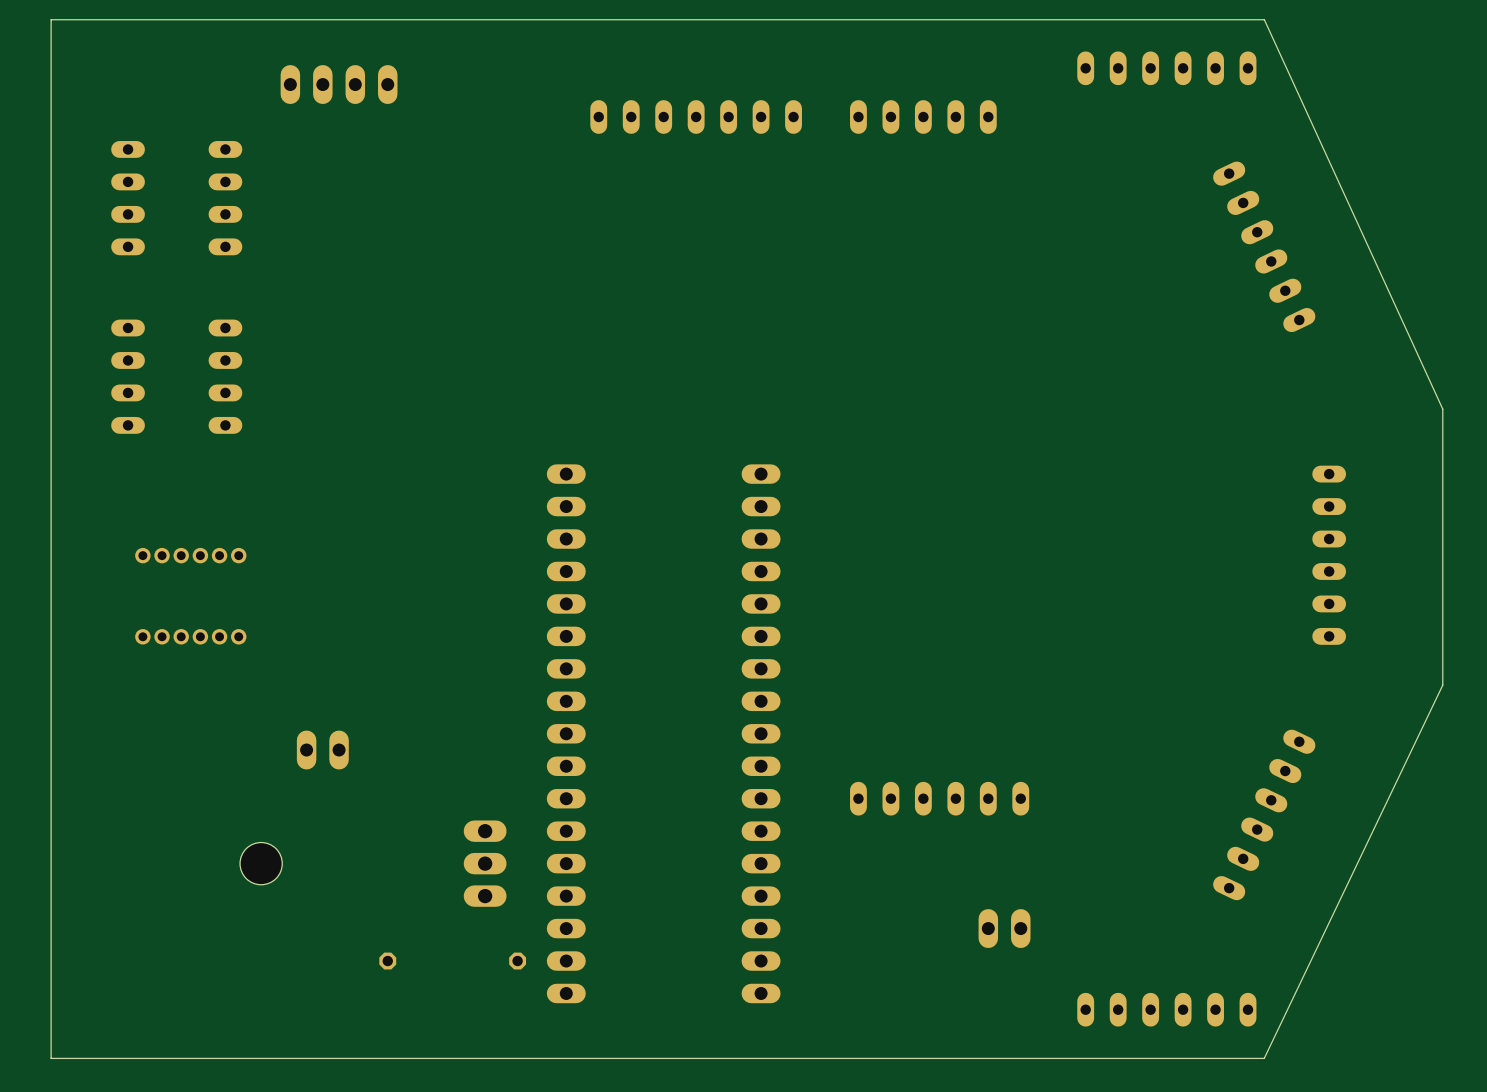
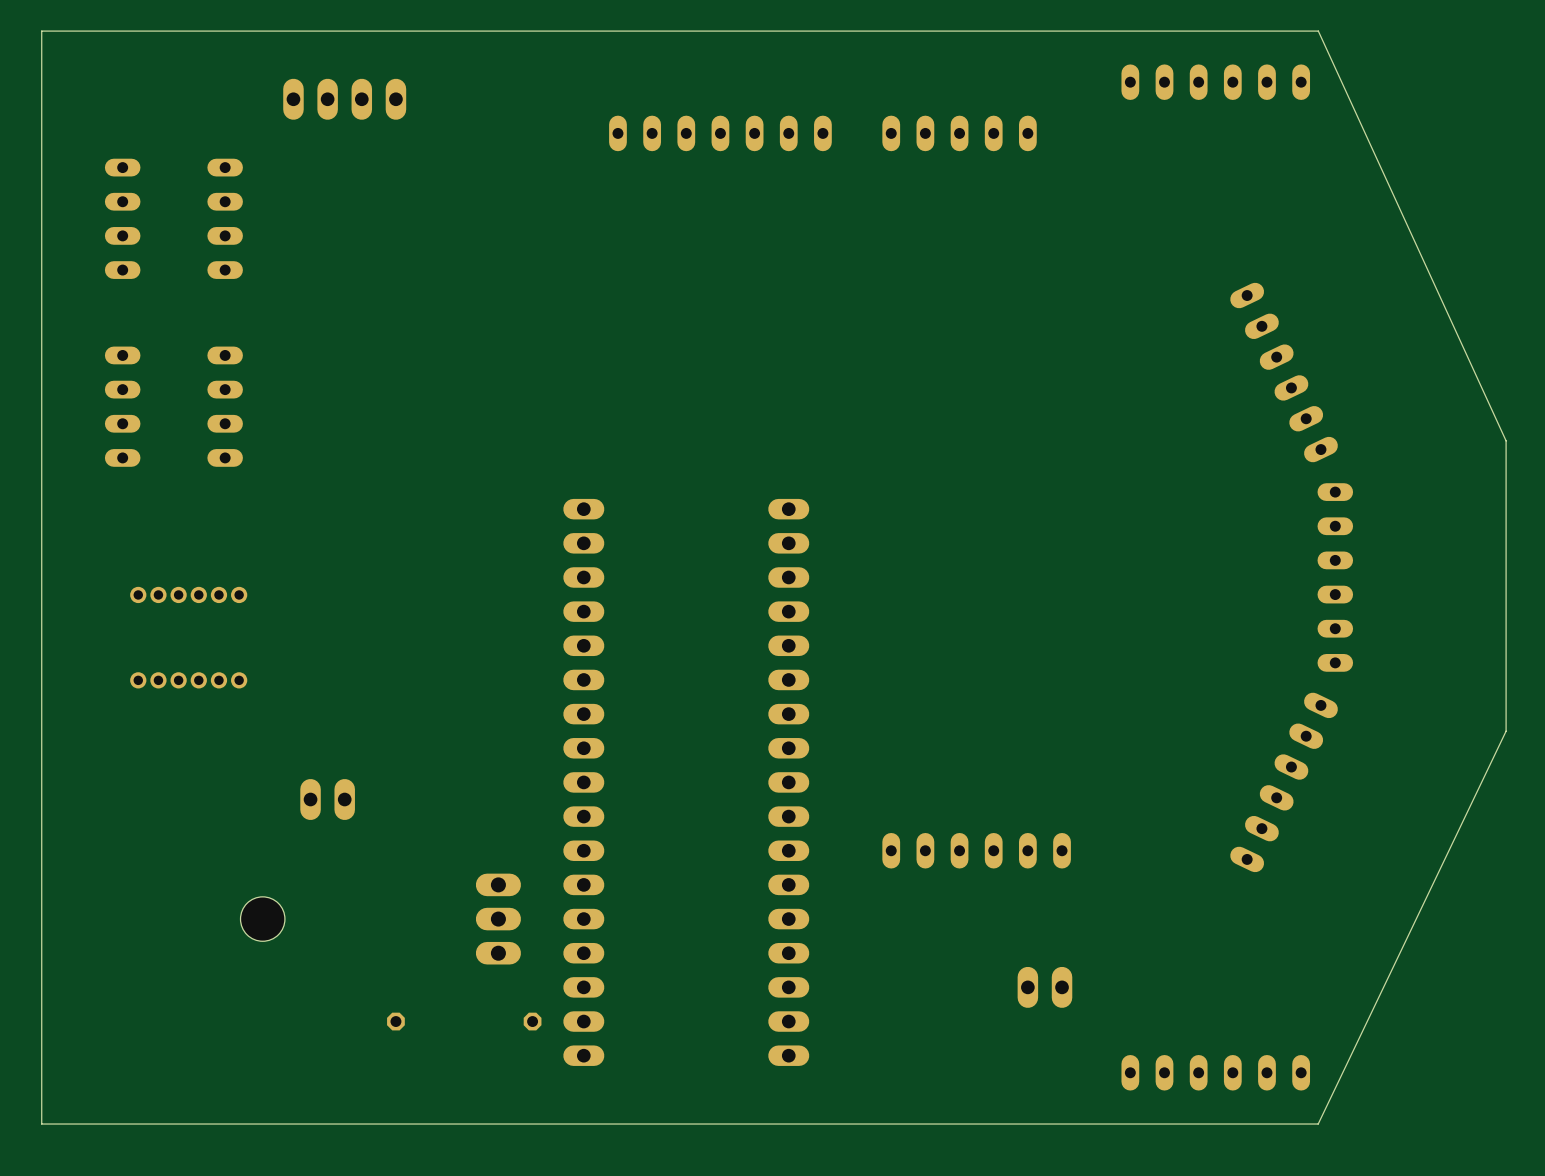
part position: (1264, 246) -> (1284, 372)
part position: (1329, 555) -> (1335, 577)
part position: (1264, 814) -> (1284, 782)

